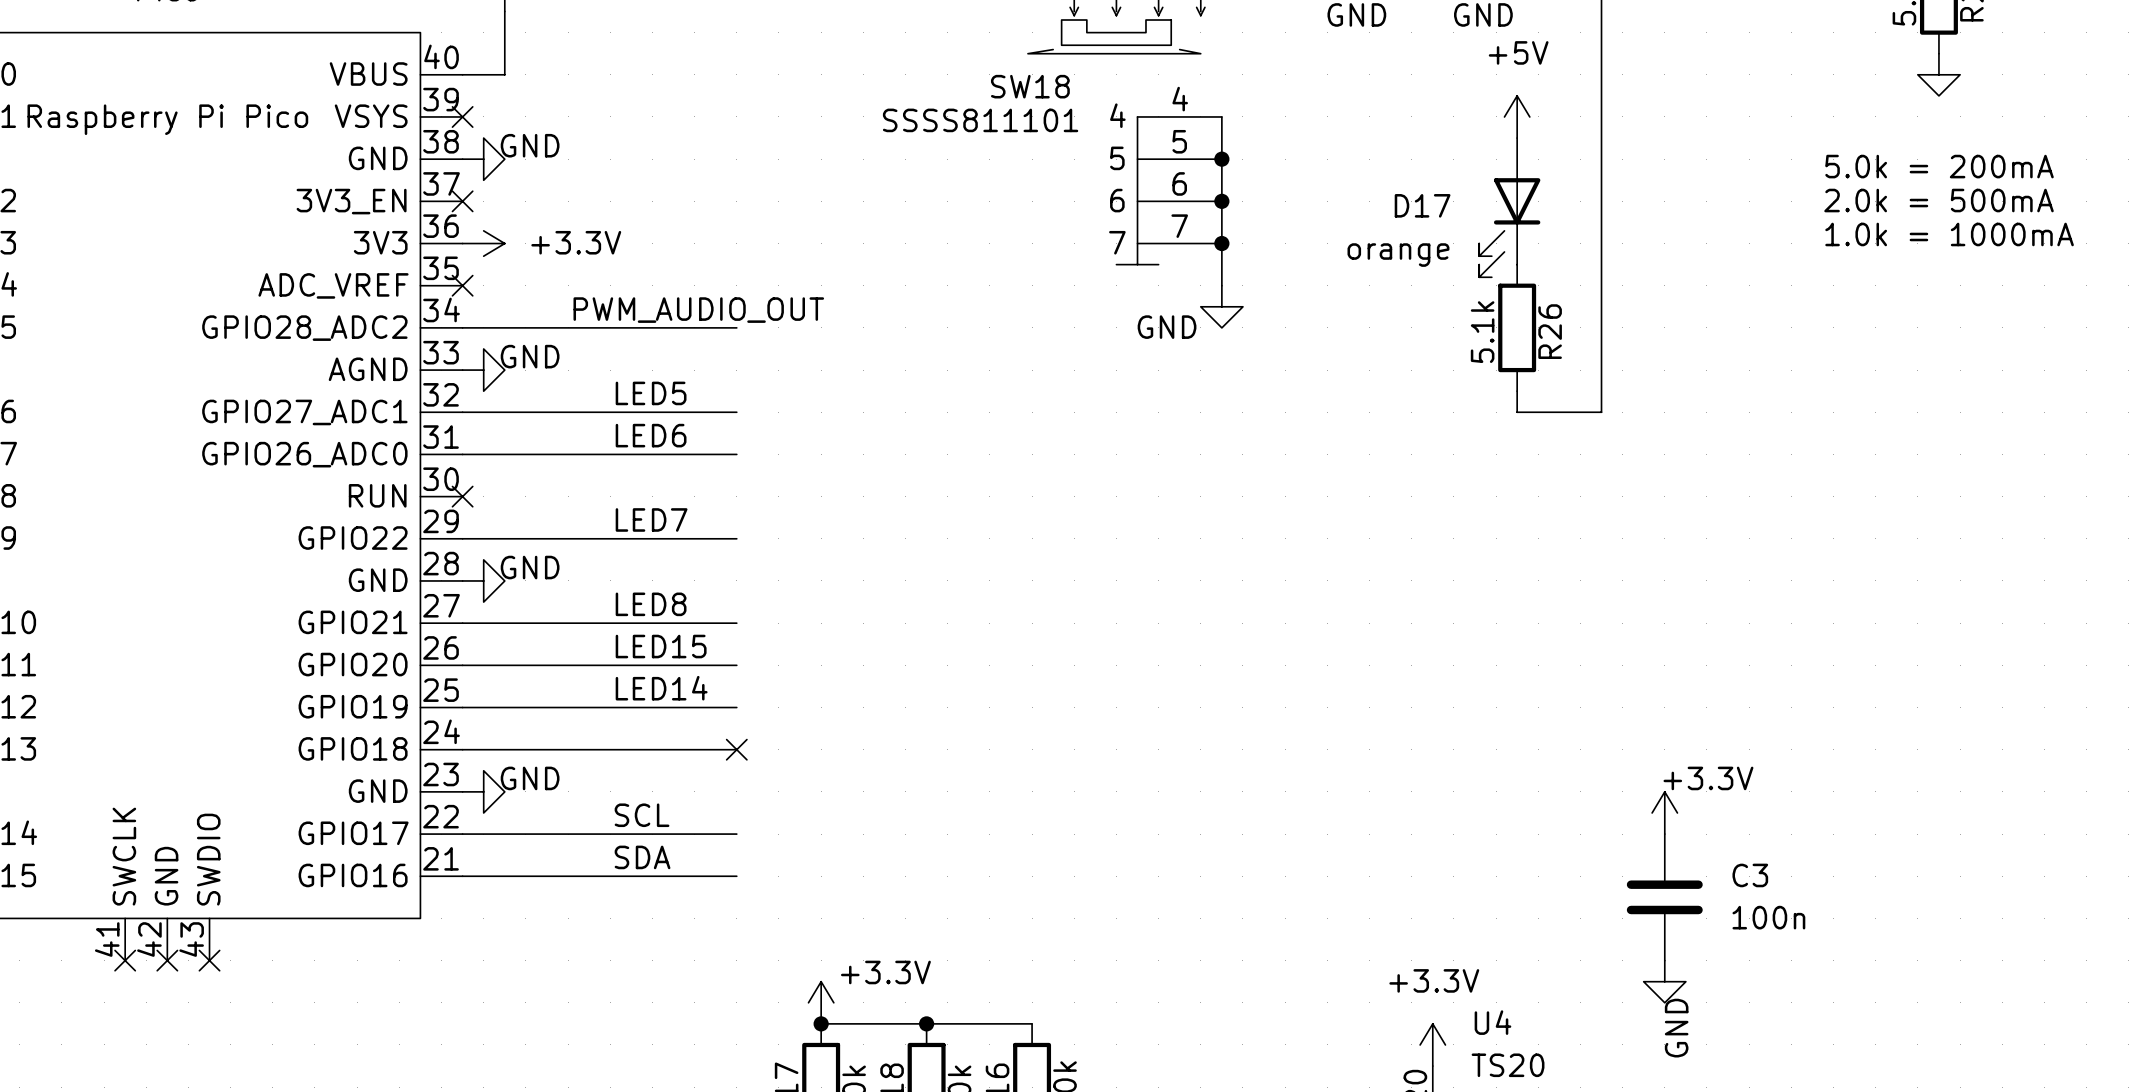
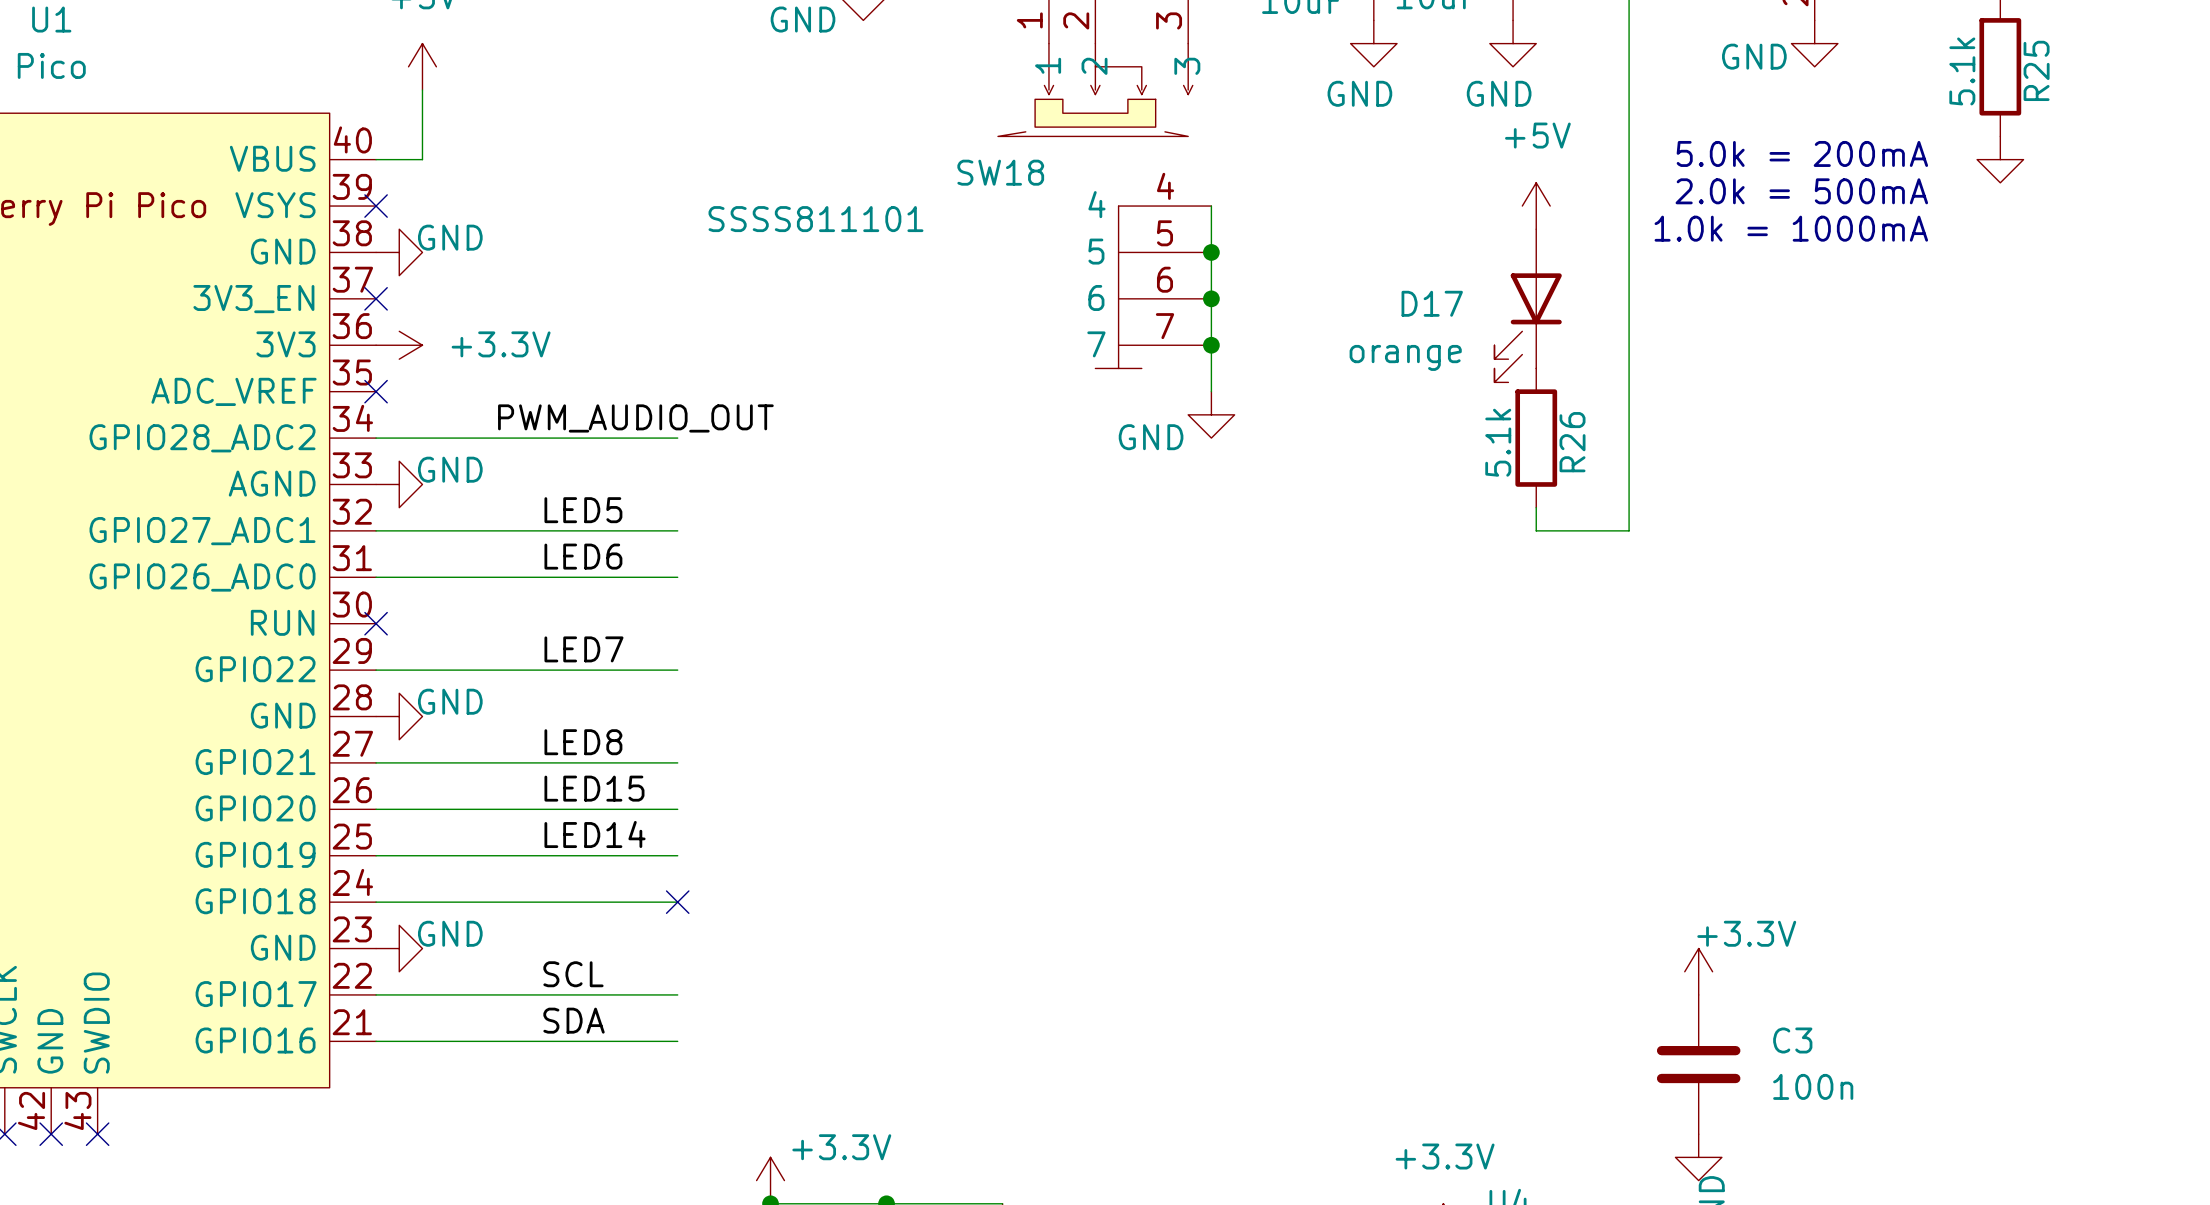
SW18 value position: SSSS811101 (980, 120) -> SSSS811101 (815, 219)
text position: 5.0k = 200mA (1939, 166) -> 5.0k = 200mA (1802, 153)
text position: 2.0k = 500mA (1939, 200) -> 2.0k = 500mA (1801, 191)
text position: 1.0k = 1000mA (1949, 234) -> 1.0k = 1000mA (1791, 228)

